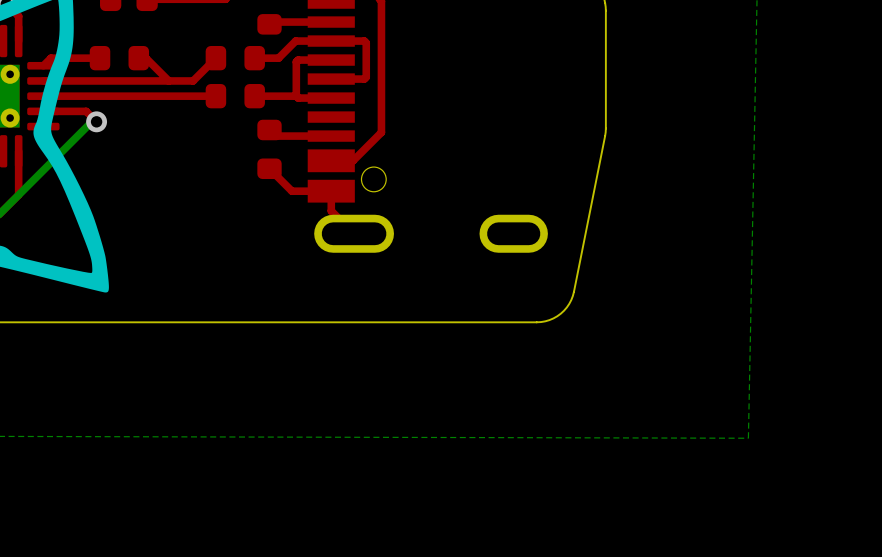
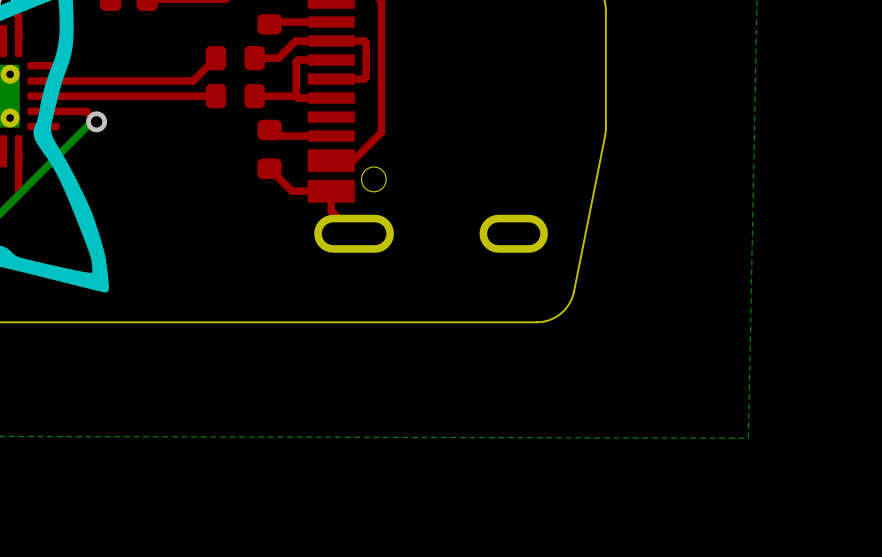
top track: (100, 58) (50, 58) (43, 65) -> none
part: (119, 58) -> none
top track: (138, 58) (145, 58) (168, 80) -> none

